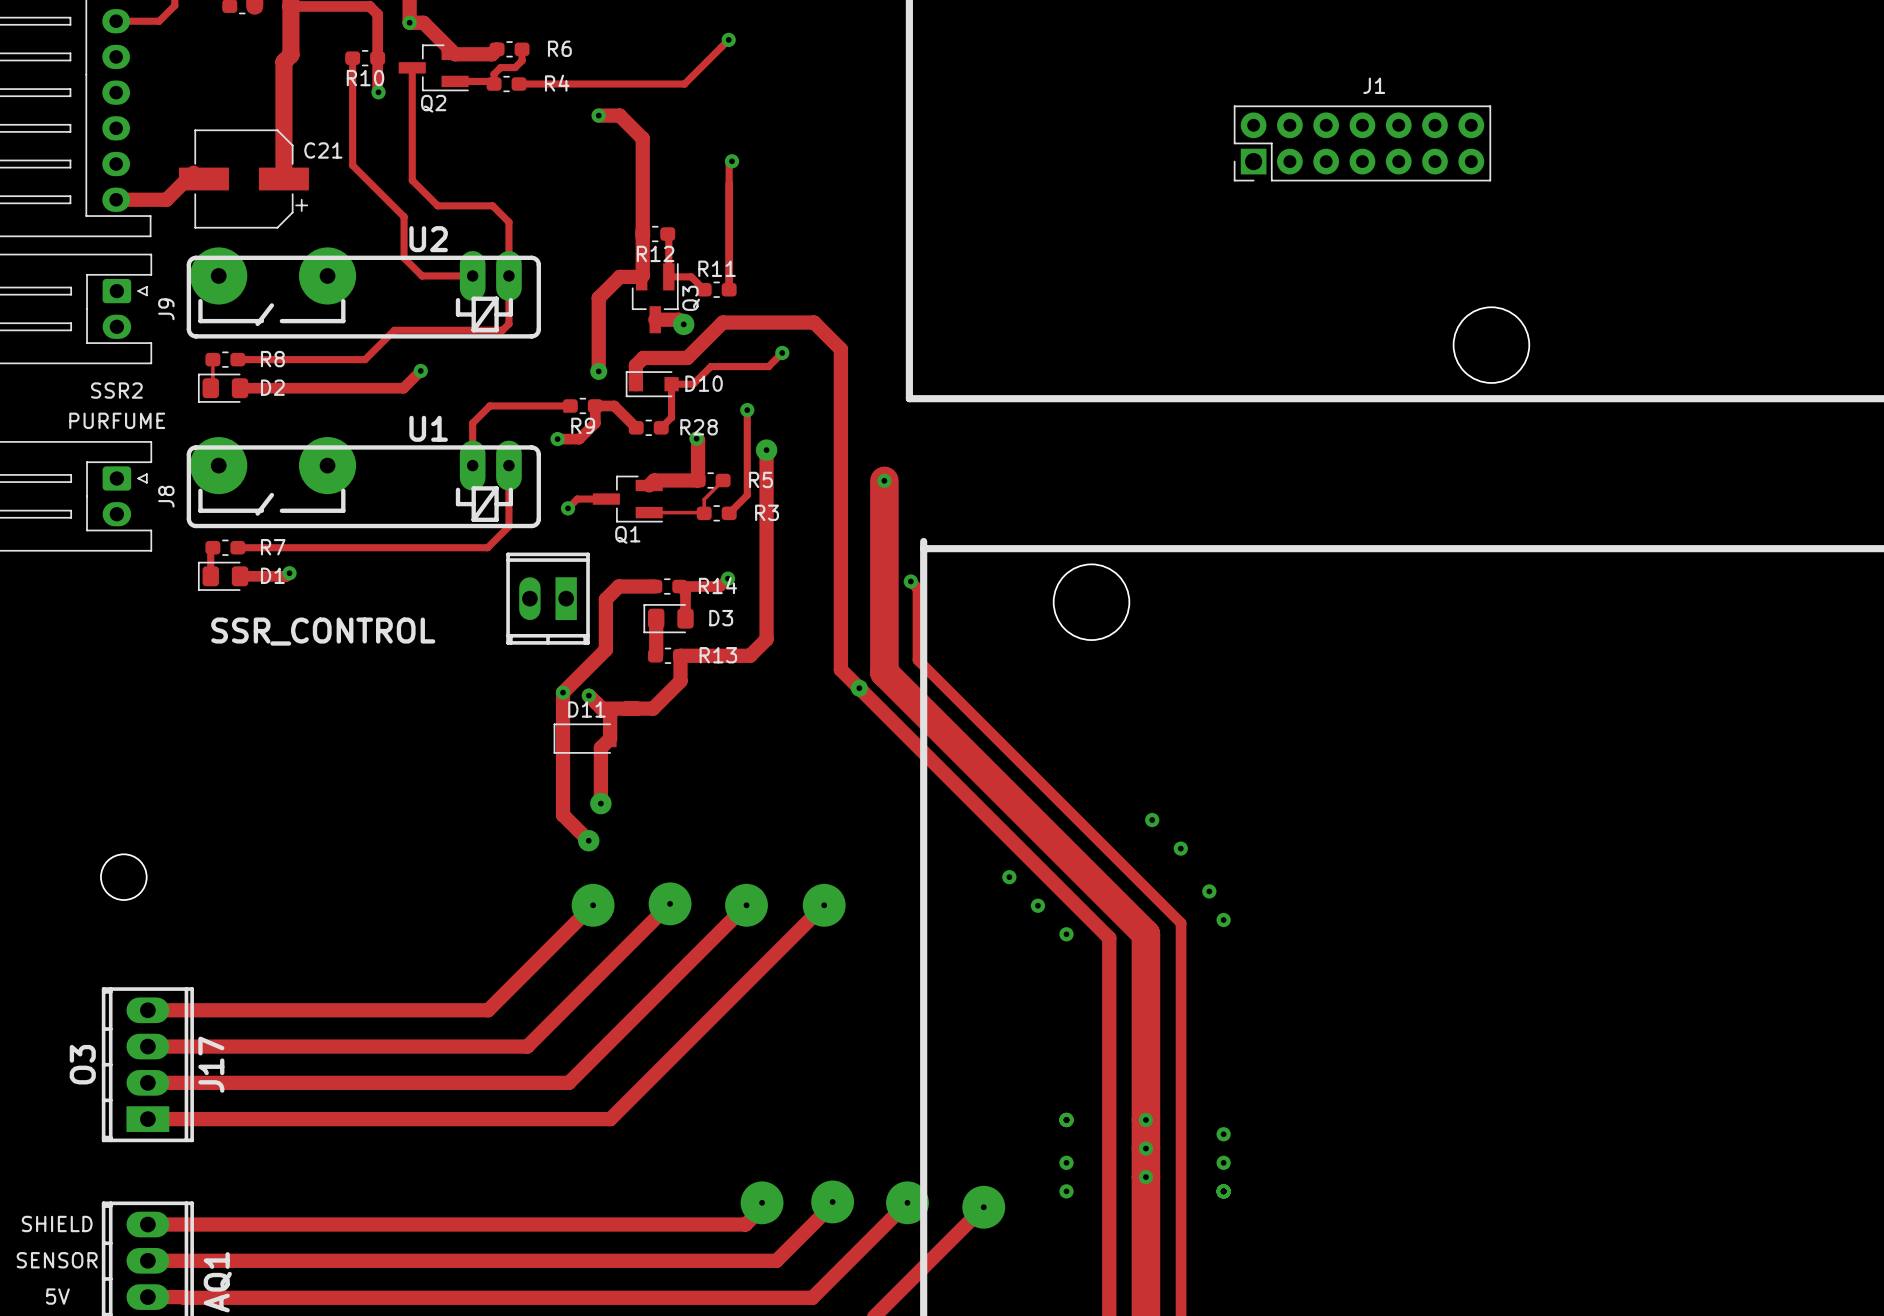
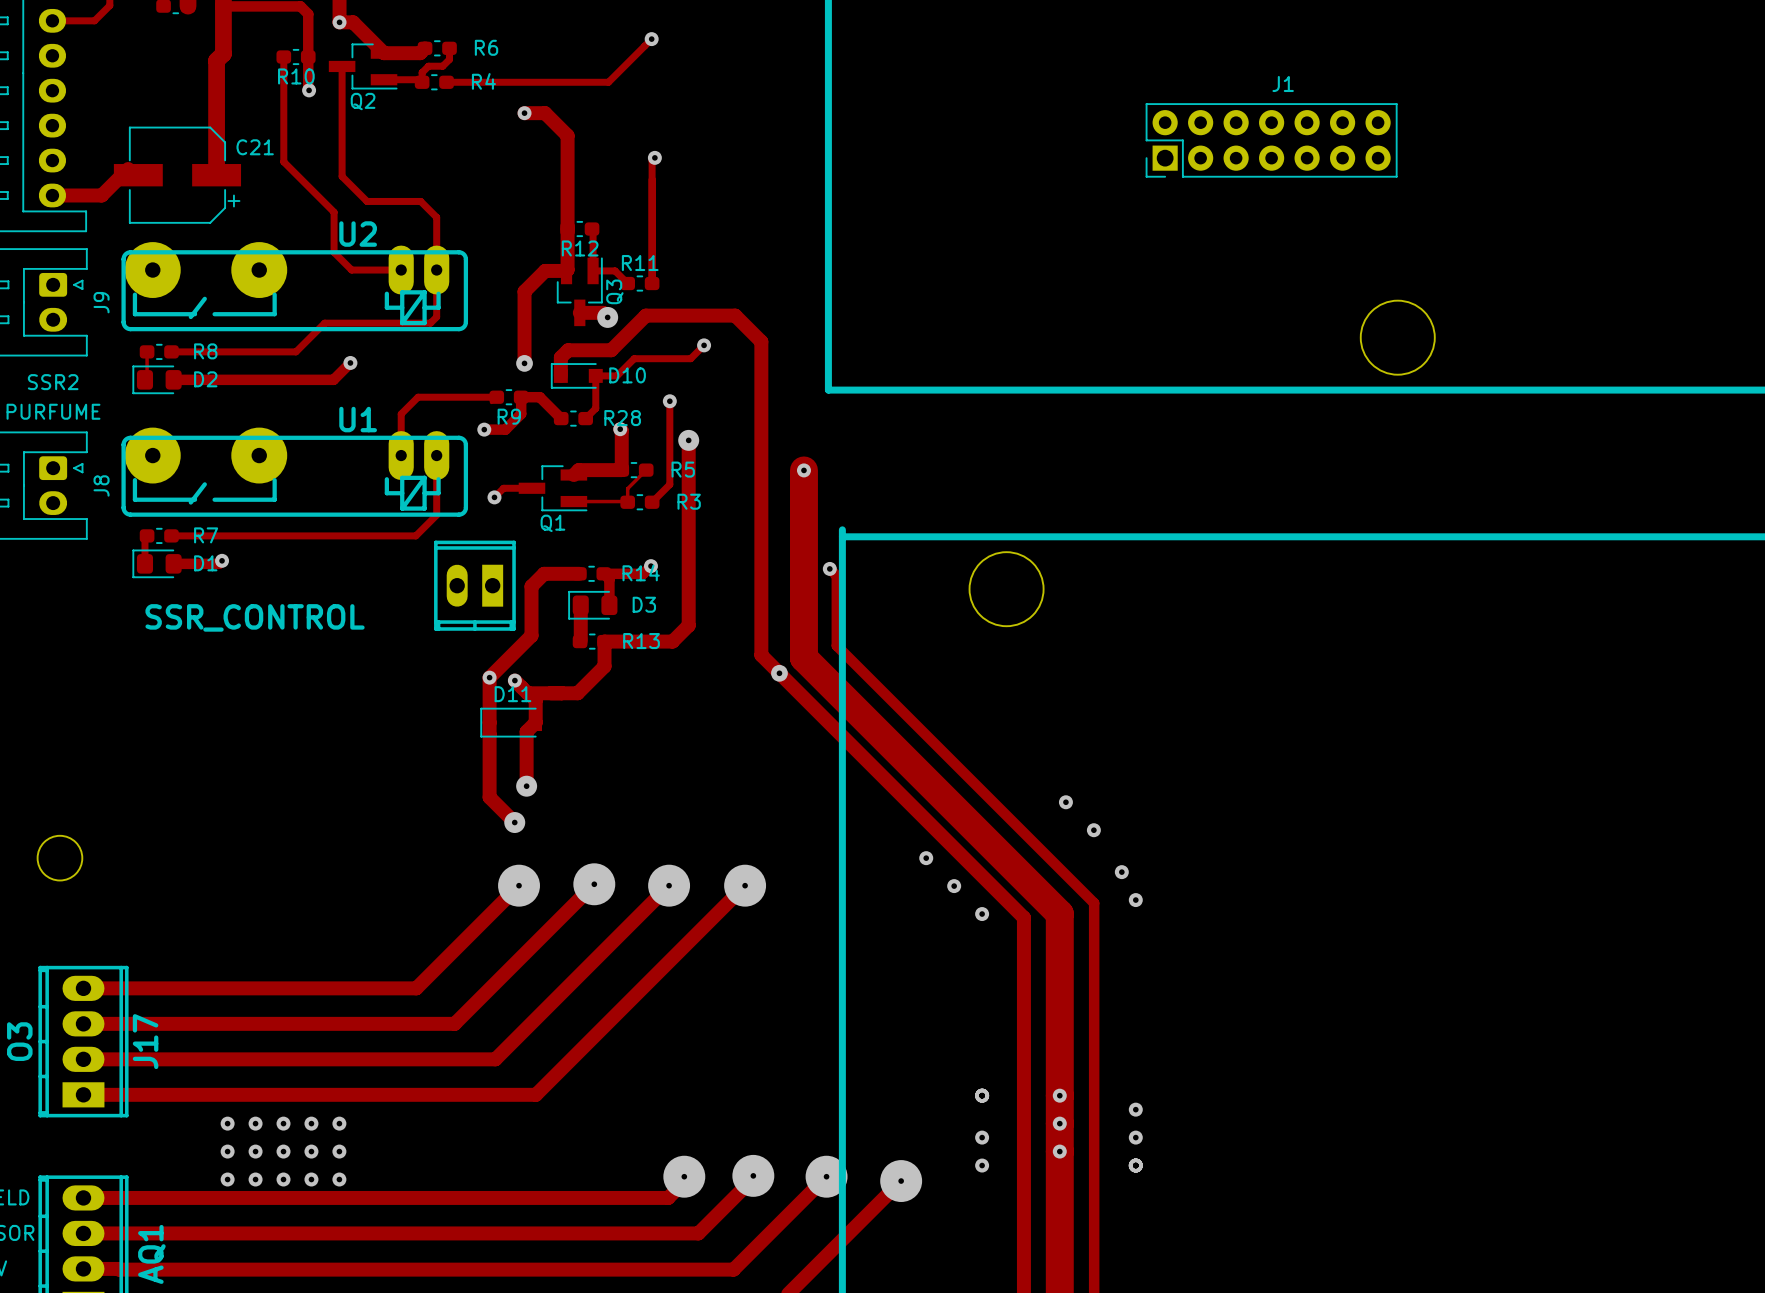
via: none -> (227, 1123)
via: none -> (255, 1123)
via: none -> (283, 1123)
via: none -> (311, 1123)
via: none -> (339, 1123)
via: none -> (227, 1151)
via: none -> (255, 1151)
via: none -> (283, 1151)
via: none -> (311, 1151)
via: none -> (339, 1151)
via: none -> (227, 1179)
via: none -> (255, 1179)
via: none -> (283, 1179)
via: none -> (311, 1179)
via: none -> (339, 1179)

